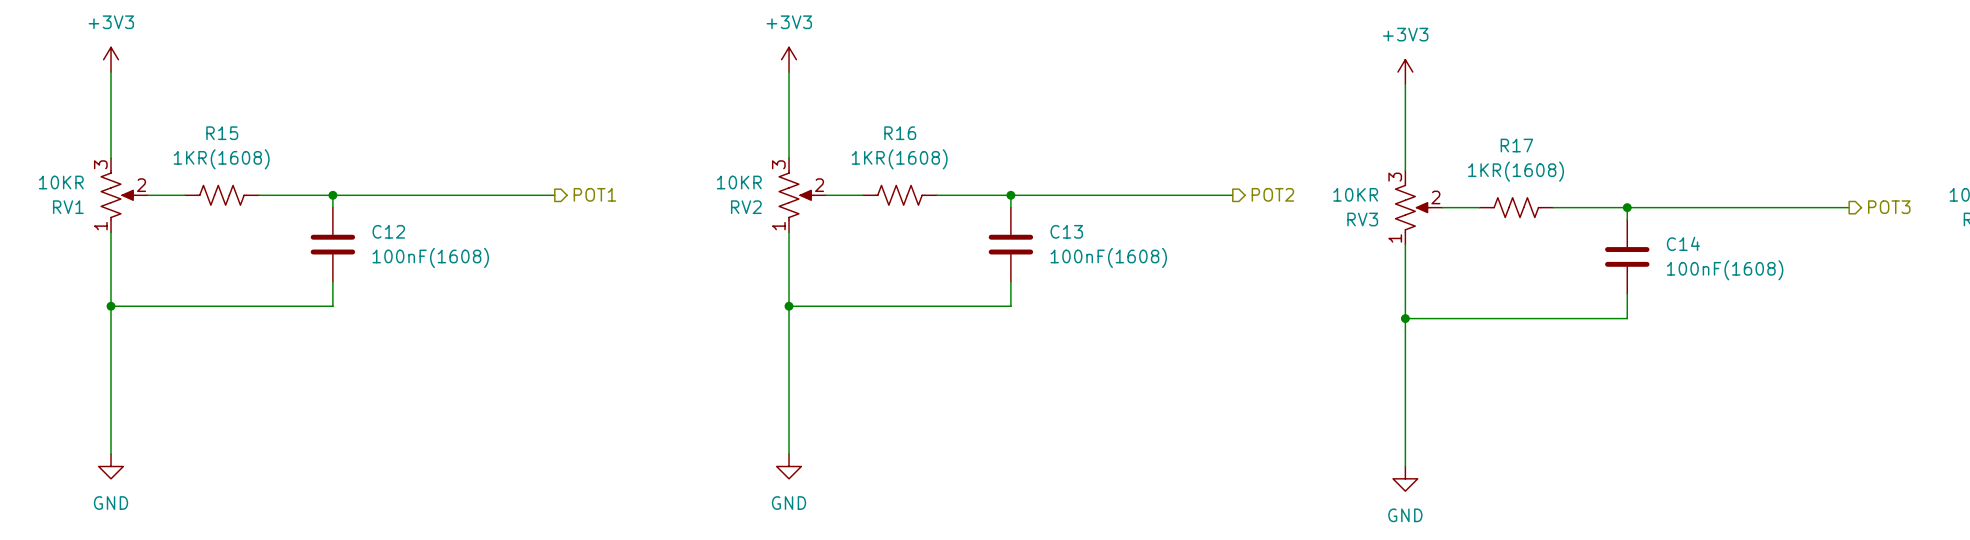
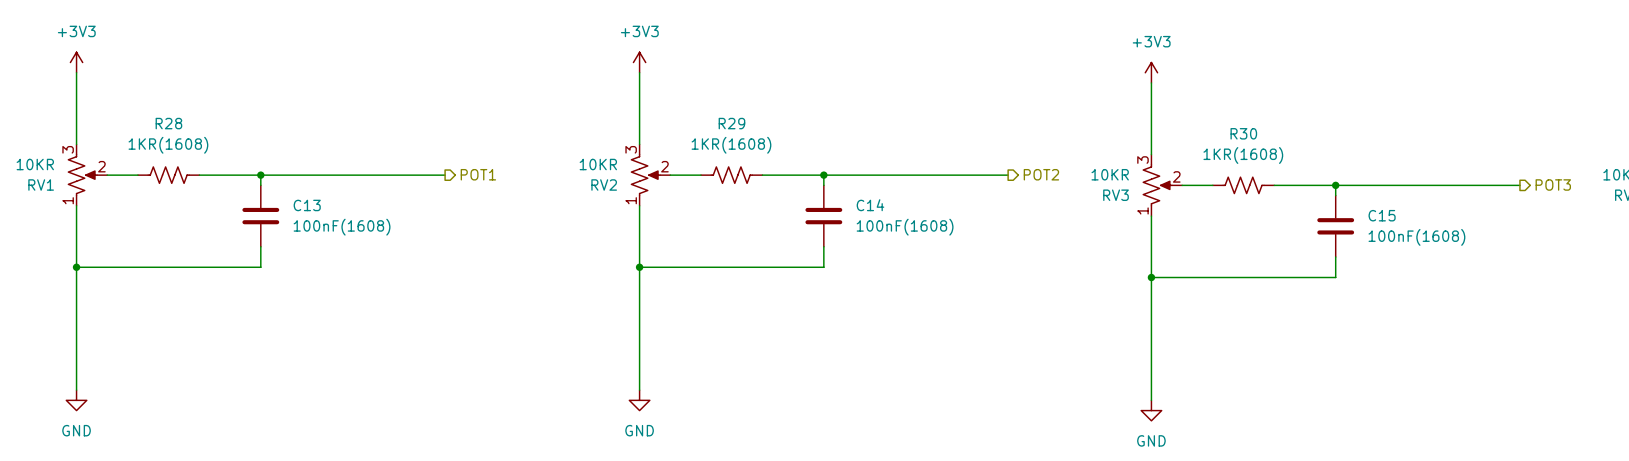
R15 name: R15 (222, 133) -> R28 (168, 123)
R16 name: R16 (900, 133) -> R29 (731, 123)
R17 name: R17 (1516, 145) -> R30 (1243, 133)
C12 name: C12 (388, 231) -> C13 (307, 205)
C13 name: C13 (1066, 231) -> C14 (870, 205)
C14 name: C14 (1683, 243) -> C15 (1382, 215)

